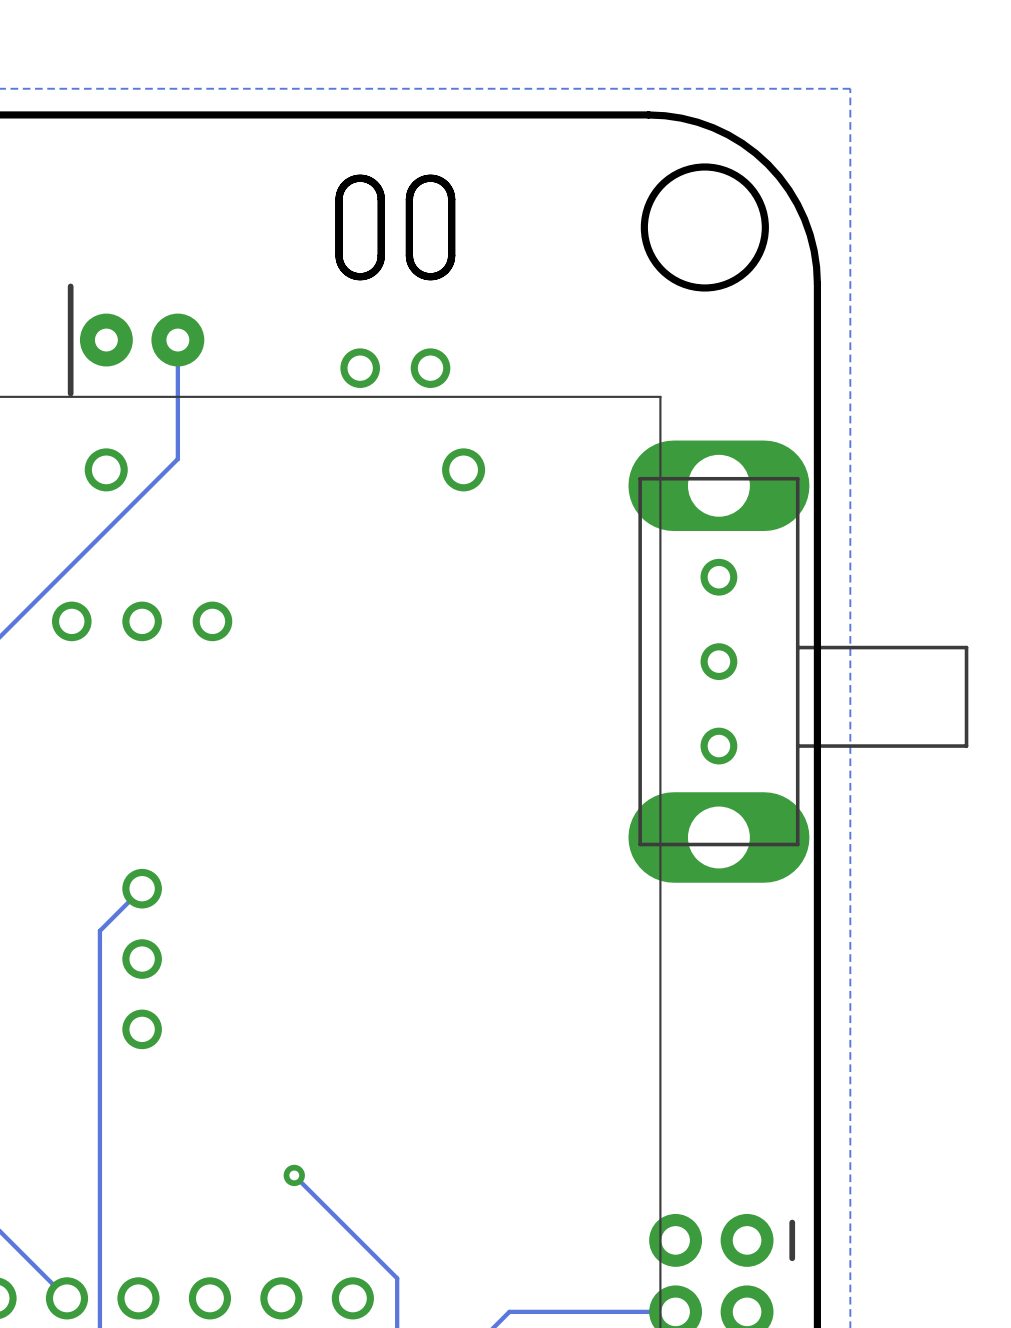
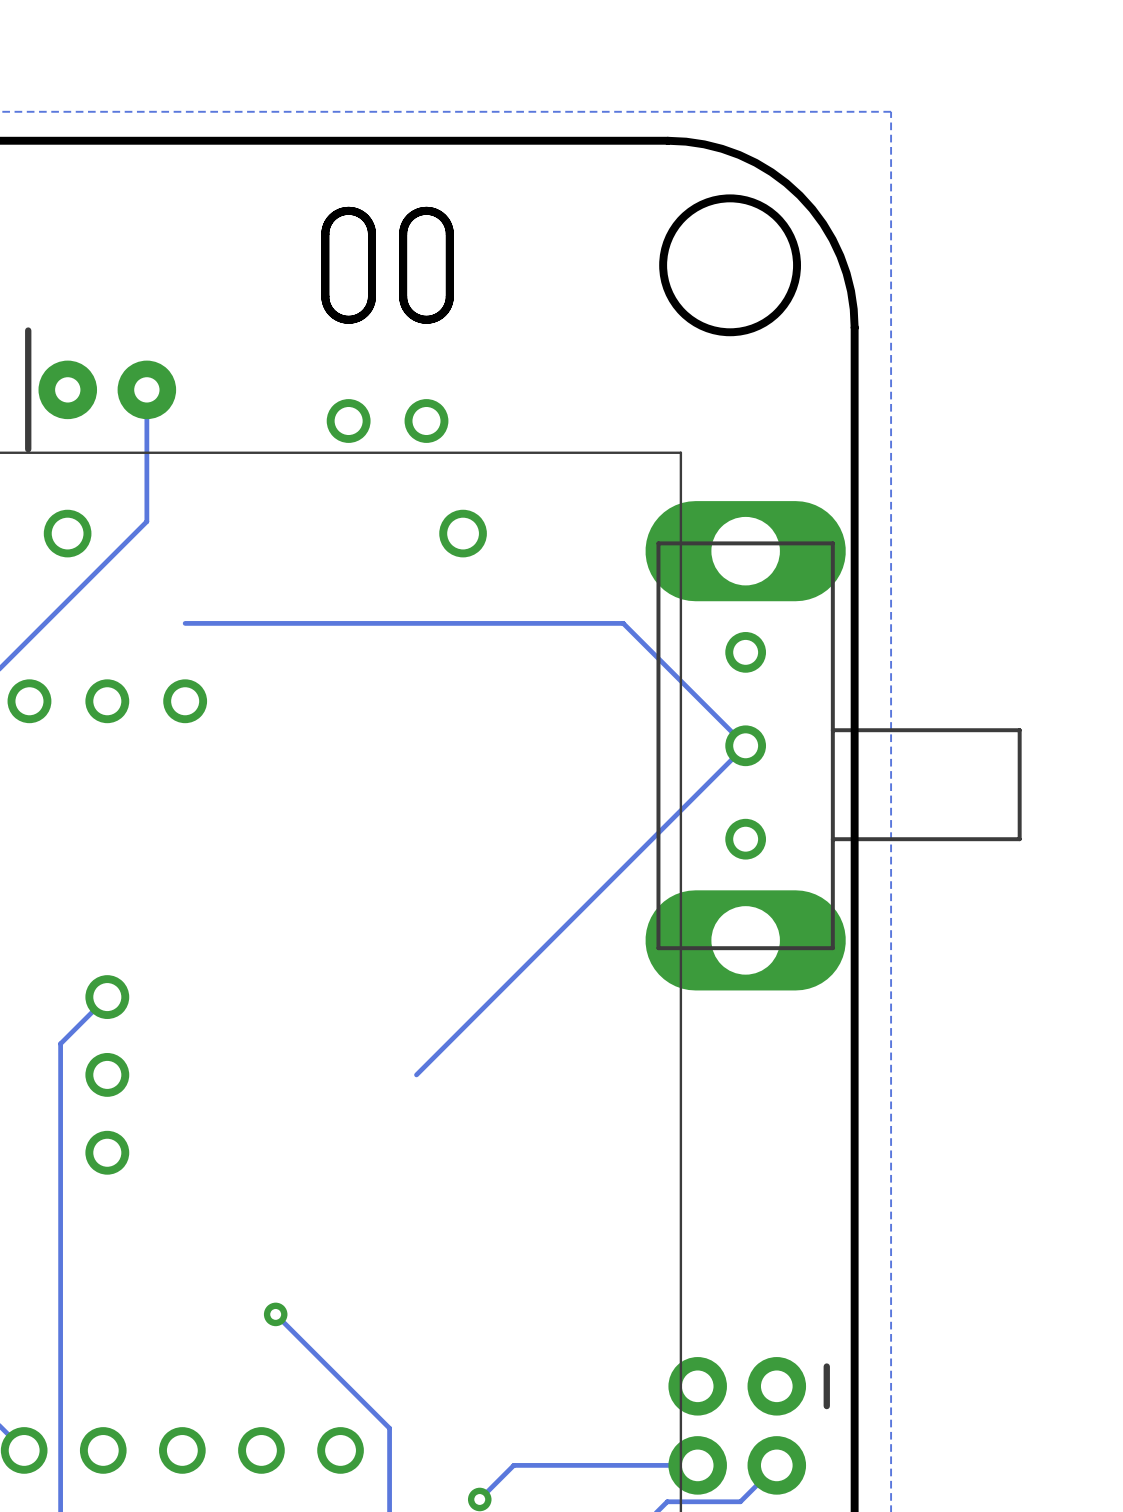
track: none -> (185, 623) (623, 623) (745, 745) (416, 1074)

